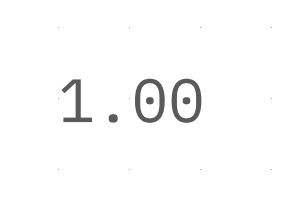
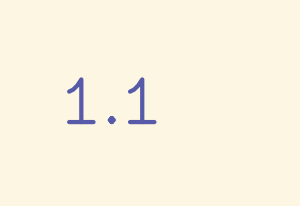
text: 1.00 (131, 100) -> 1.1 (111, 100)

